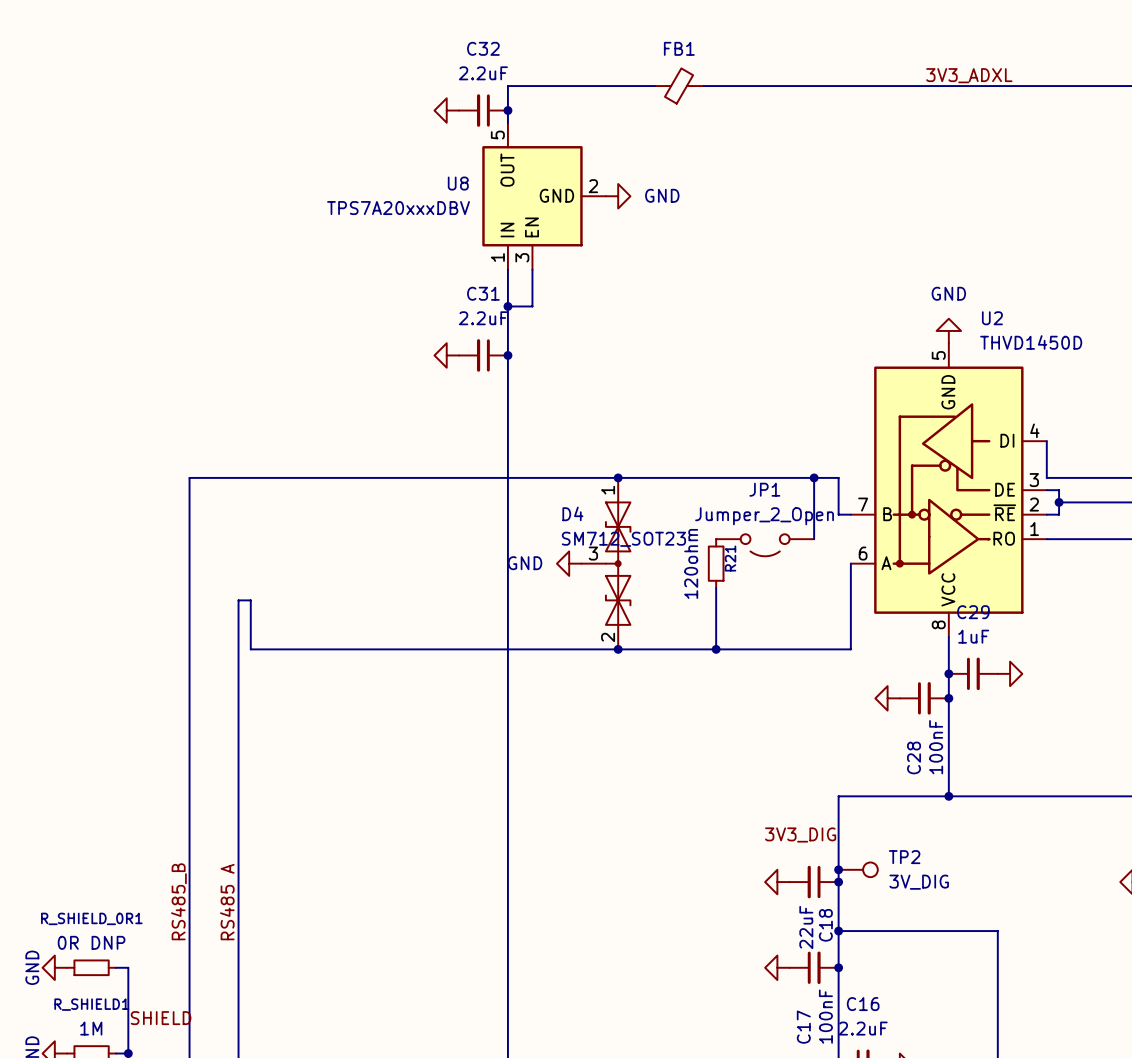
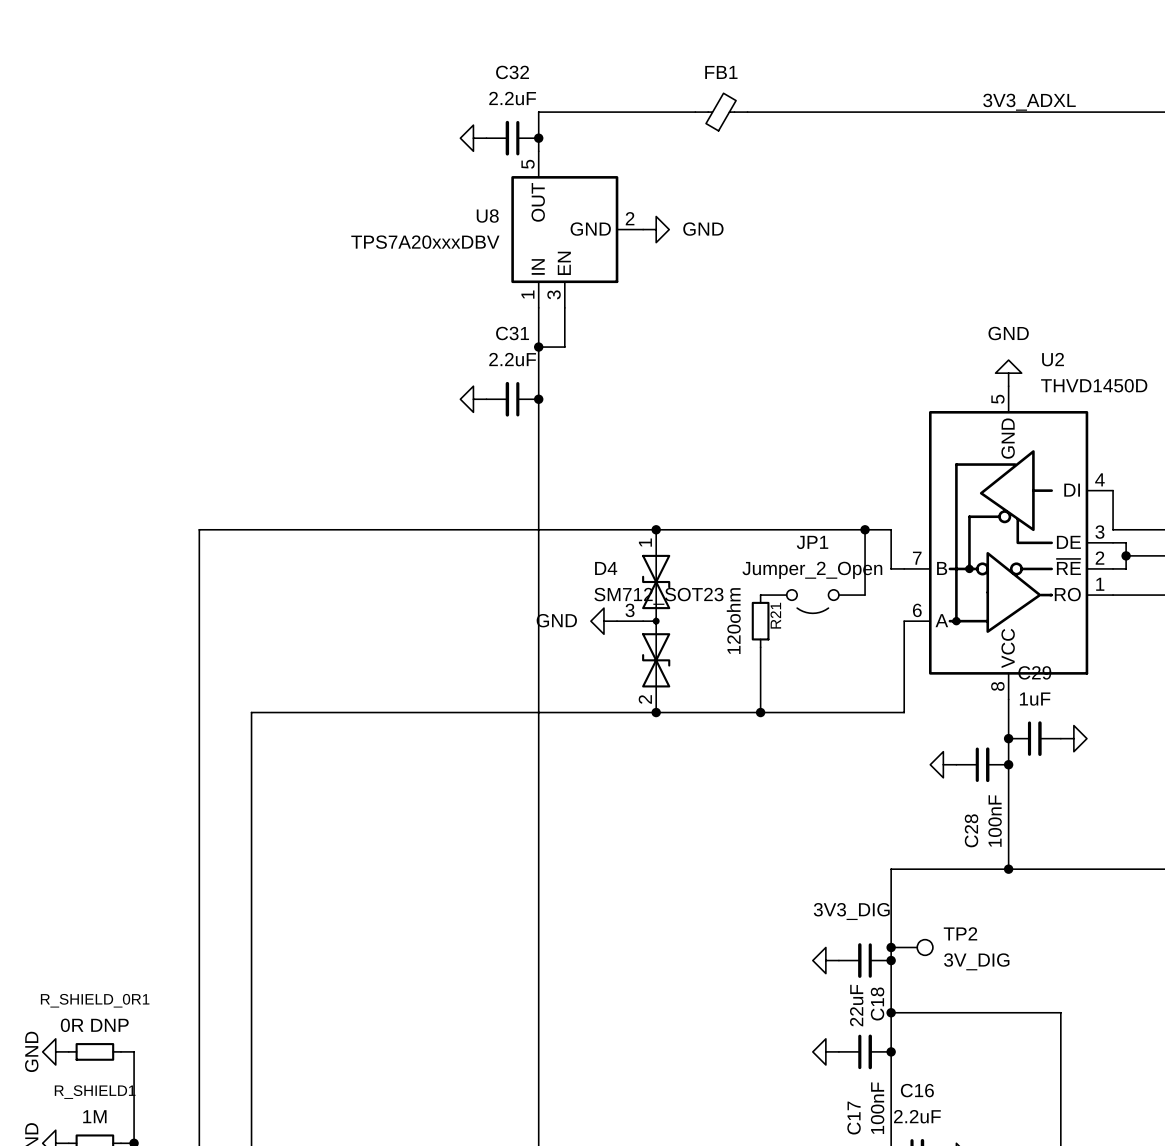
wire: (238, 649) (238, 600) (250, 600) (250, 649) -> (251, 712) (264, 712)
label: RS485_B (178, 901) -> none
label: RS485 A (227, 902) -> none
label: SHIELD (161, 1018) -> none

